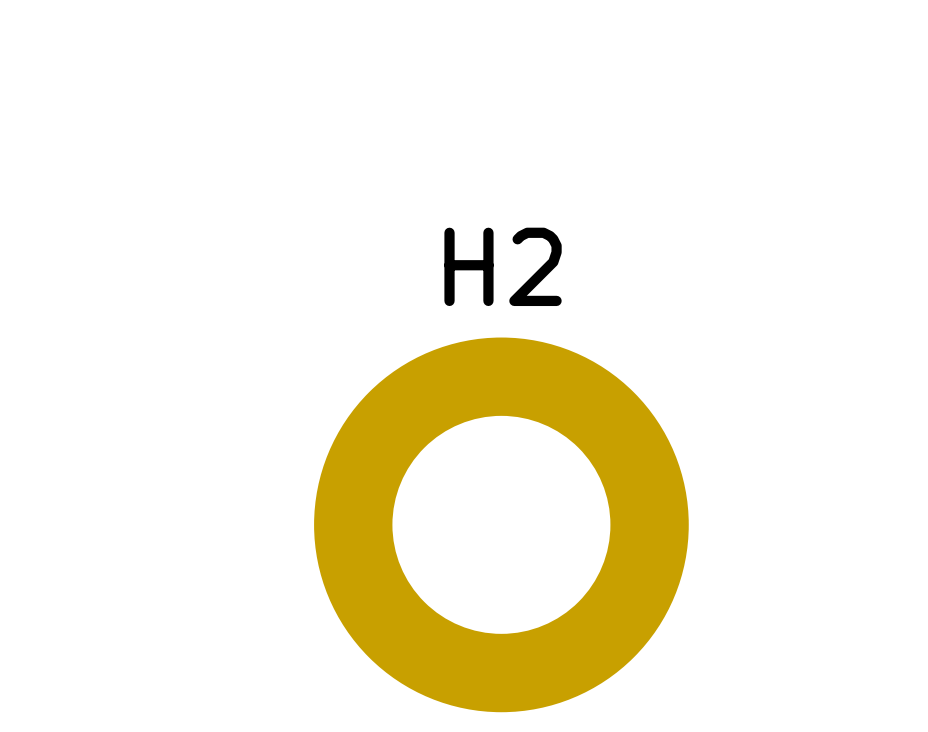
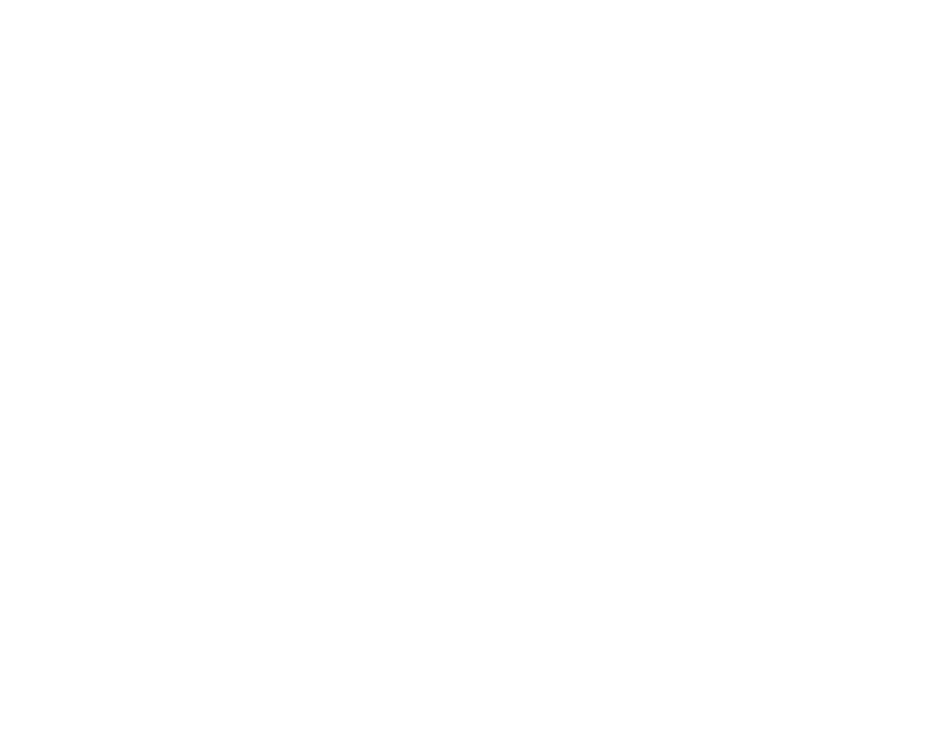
H2: (501, 524) -> none

